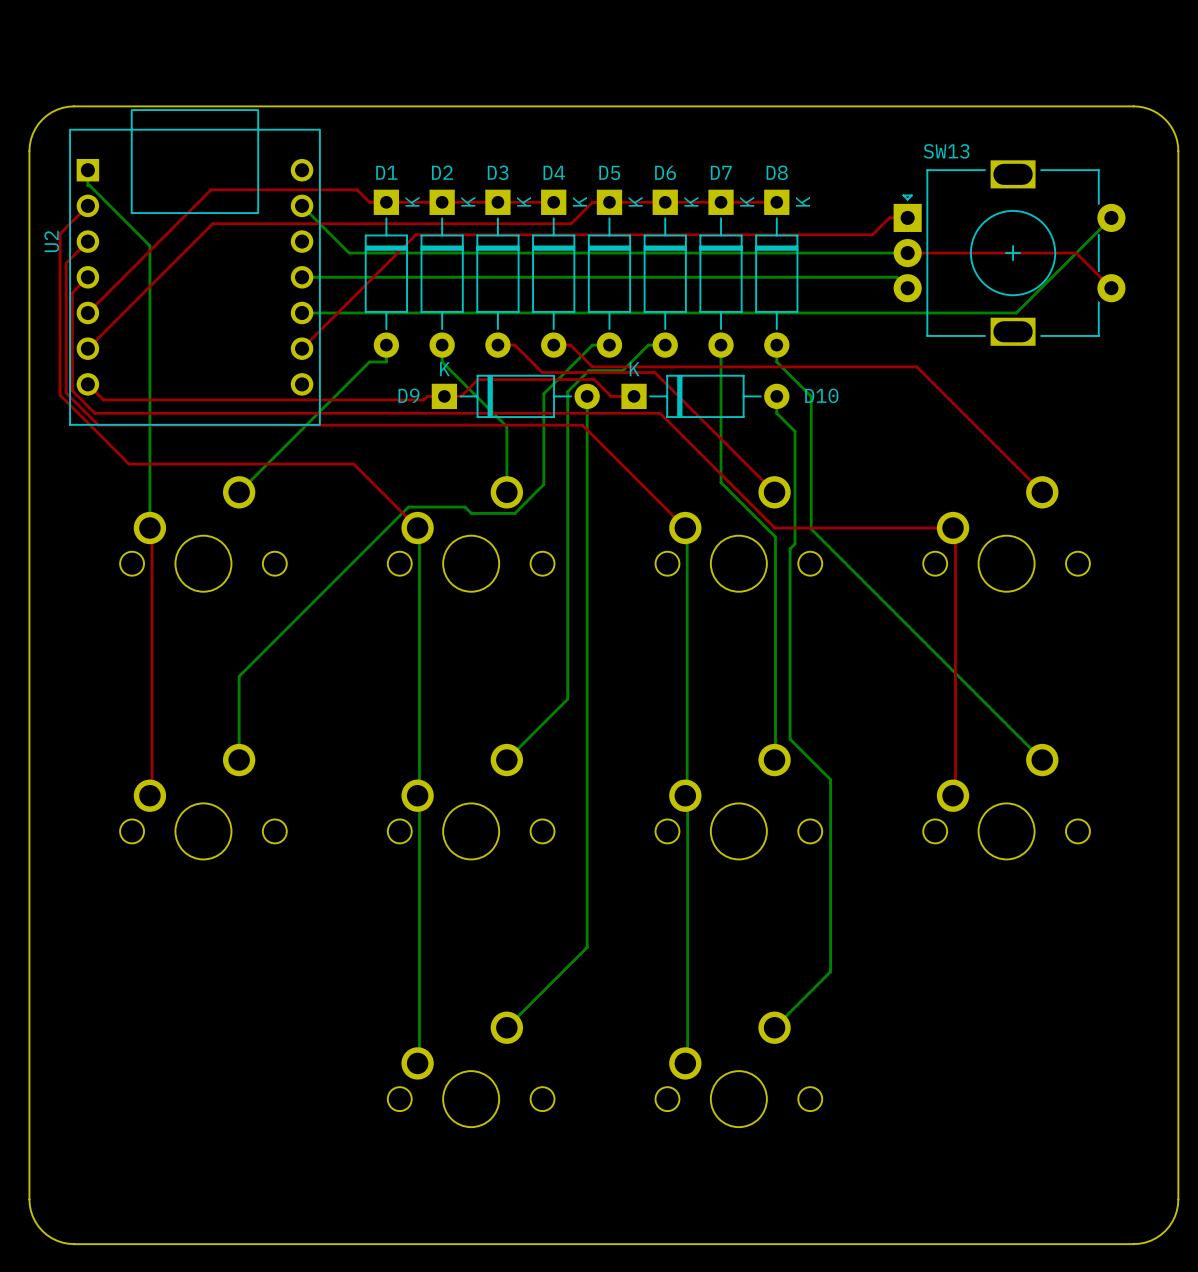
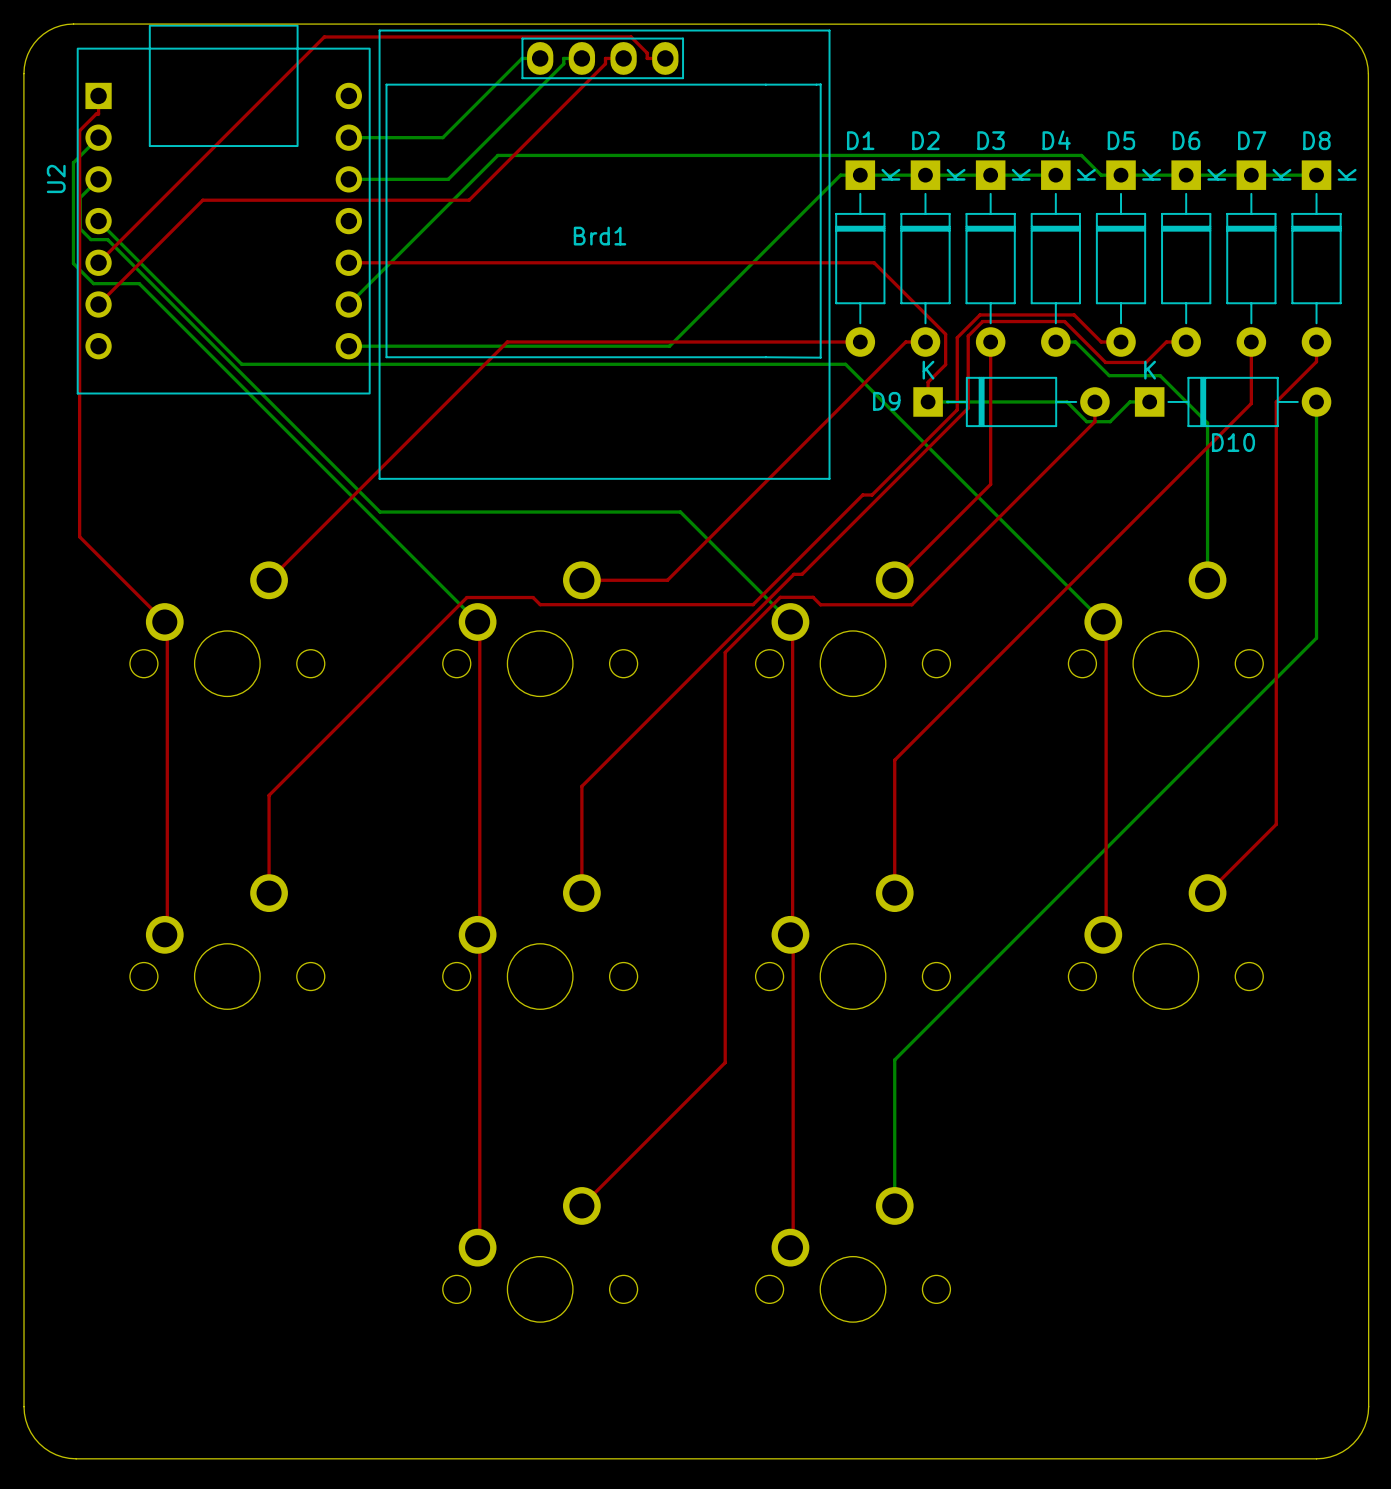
bottom track: none -> (540, 58) (522, 58) (442, 137) (348, 137)
bottom track: none -> (581, 58) (563, 58) (563, 63) (448, 179) (348, 179)
top track: none -> (623, 58) (605, 58) (605, 63) (469, 200) (202, 200) (98, 304)
top track: none -> (665, 58) (647, 58) (647, 53) (631, 36) (324, 36) (98, 262)
top track: none -> (98, 95) (98, 114) (79, 130) (79, 536) (164, 621)
bottom track: none -> (1055, 175) (840, 175) (669, 346) (348, 346)
bottom track: none -> (1316, 175) (1101, 175) (1081, 155) (497, 155) (348, 304)
bottom track: (87, 170) (87, 185) (149, 245) (149, 528) -> none
bottom track: none -> (98, 221) (241, 364) (845, 364) (1103, 621)
top track: (553, 202) (369, 202) (357, 189) (211, 189) (87, 312) -> none
top track: (776, 202) (592, 202) (571, 223) (212, 223) (87, 348) -> none
top track: (87, 205) (60, 233) (60, 395) (129, 464) (353, 464) (417, 528) -> (477, 1247) (479, 1245) (479, 937) (477, 934) (479, 932) (479, 624) (477, 621)
bottom track: (302, 205) (349, 253) (907, 253) -> none
Brd1: none -> (604, 254)
top track: (907, 217) (889, 217) (872, 234) (415, 234) (302, 348) -> none
bottom track: (1111, 217) (1016, 312) (302, 312) -> none
top track: none -> (348, 262) (874, 262) (945, 334) (945, 364) (928, 382) (928, 401)
top track: (87, 241) (66, 263) (66, 393) (98, 425) (582, 425) (685, 528) -> (790, 1247) (793, 1244) (793, 937) (790, 934) (792, 932) (792, 624) (790, 621)
top track: (907, 253) (1076, 253) (1111, 288) -> none
SW13: (1009, 253) -> none
U2 position: (194, 267) -> (223, 209)
D1 position: (386, 273) -> (860, 258)
D2 position: (442, 273) -> (925, 258)
D3 position: (497, 273) -> (990, 258)
D4 position: (553, 273) -> (1055, 258)
D5 position: (609, 273) -> (1121, 258)
D6 position: (665, 273) -> (1186, 258)
D7 position: (721, 273) -> (1251, 258)
D8 position: (776, 273) -> (1316, 258)
top track: (87, 277) (72, 292) (72, 390) (94, 413) (660, 413) (774, 528) (953, 528) -> none
bottom track: (302, 277) (896, 277) (907, 288) -> none
top track: none -> (860, 342) (507, 342) (269, 580)
top track: none -> (925, 342) (905, 342) (667, 580) (581, 580)
bottom track: none -> (1055, 342) (1075, 342) (1109, 375) (1160, 375) (1207, 423) (1207, 580)
top track: none -> (1121, 342) (1101, 342) (1074, 314) (980, 314) (957, 337) (957, 409) (872, 495) (862, 495) (753, 604) (540, 604) (533, 597) (466, 597) (269, 795) (269, 893)
top track: none -> (1186, 342) (1166, 342) (1146, 362) (1105, 362) (1064, 321) (982, 321) (968, 336) (968, 408) (802, 574) (793, 574) (581, 786) (581, 893)
top track: none -> (1251, 342) (1251, 403) (894, 760) (894, 893)
top track: none -> (1316, 342) (1316, 361) (1276, 401) (1276, 824) (1207, 893)
bottom track: none -> (928, 401) (1067, 401) (1086, 421) (1110, 421) (1129, 401) (1149, 401)
top track: none -> (1094, 401) (1094, 421) (911, 604) (820, 604) (813, 597) (780, 597) (725, 652) (725, 1062) (581, 1205)
bottom track: (386, 345) (386, 361) (369, 361) (239, 492) -> none
bottom track: (442, 345) (442, 361) (506, 426) (506, 492) -> none
top track: (497, 345) (514, 345) (542, 372) (654, 372) (774, 492) -> (990, 342) (990, 484) (894, 580)
top track: (553, 345) (570, 345) (592, 366) (916, 366) (1042, 492) -> none
bottom track: (609, 345) (592, 345) (543, 393) (543, 484) (514, 513) (471, 513) (465, 507) (408, 507) (239, 676) (239, 760) -> none
bottom track: (665, 345) (648, 345) (622, 370) (588, 370) (567, 391) (567, 699) (506, 760) -> none
bottom track: (721, 345) (721, 482) (775, 537) (774, 760) -> none
bottom track: (776, 345) (776, 361) (811, 396) (811, 529) (1042, 760) -> none
top track: (87, 384) (103, 399) (423, 399) (427, 396) (461, 396) (478, 379) (594, 379) (611, 396) (634, 396) -> none
D10 name position: D10 (821, 395) -> D10 (1233, 442)
D9 position: (515, 396) -> (1011, 401)
bottom track: (587, 396) (587, 947) (506, 1027) -> none
D10 position: (705, 396) -> (1233, 401)
bottom track: (776, 396) (776, 413) (795, 431) (795, 543) (790, 548) (790, 739) (830, 779) (830, 971) (774, 1027) -> (1316, 401) (1316, 638) (894, 1059) (894, 1205)
bottom track: (417, 528) (419, 529) (419, 793) (417, 795) (419, 797) (419, 1061) (417, 1063) -> (477, 621) (139, 283) (93, 283) (73, 263) (73, 162) (98, 137)
bottom track: (685, 528) (687, 529) (687, 793) (685, 795) (687, 798) (687, 1061) (685, 1063) -> (790, 621) (680, 512) (380, 512) (107, 239) (90, 239) (80, 228) (80, 197) (98, 179)
board edge: (29, 1199) (29, 151) (32, 133) (42, 119) (56, 109) (74, 106) (1133, 106) (1153, 110) (1165, 119) (1173, 131) (1178, 151) (1178, 1199) (1174, 1216) (1165, 1231) (1150, 1240) (1133, 1244) -> (24, 1406) (23, 73) (27, 54) (38, 38) (54, 27) (73, 24) (1318, 24) (1337, 28) (1353, 38) (1364, 54) (1368, 73) (1368, 1406) (1364, 1426) (1353, 1443) (1336, 1454) (1314, 1458)

